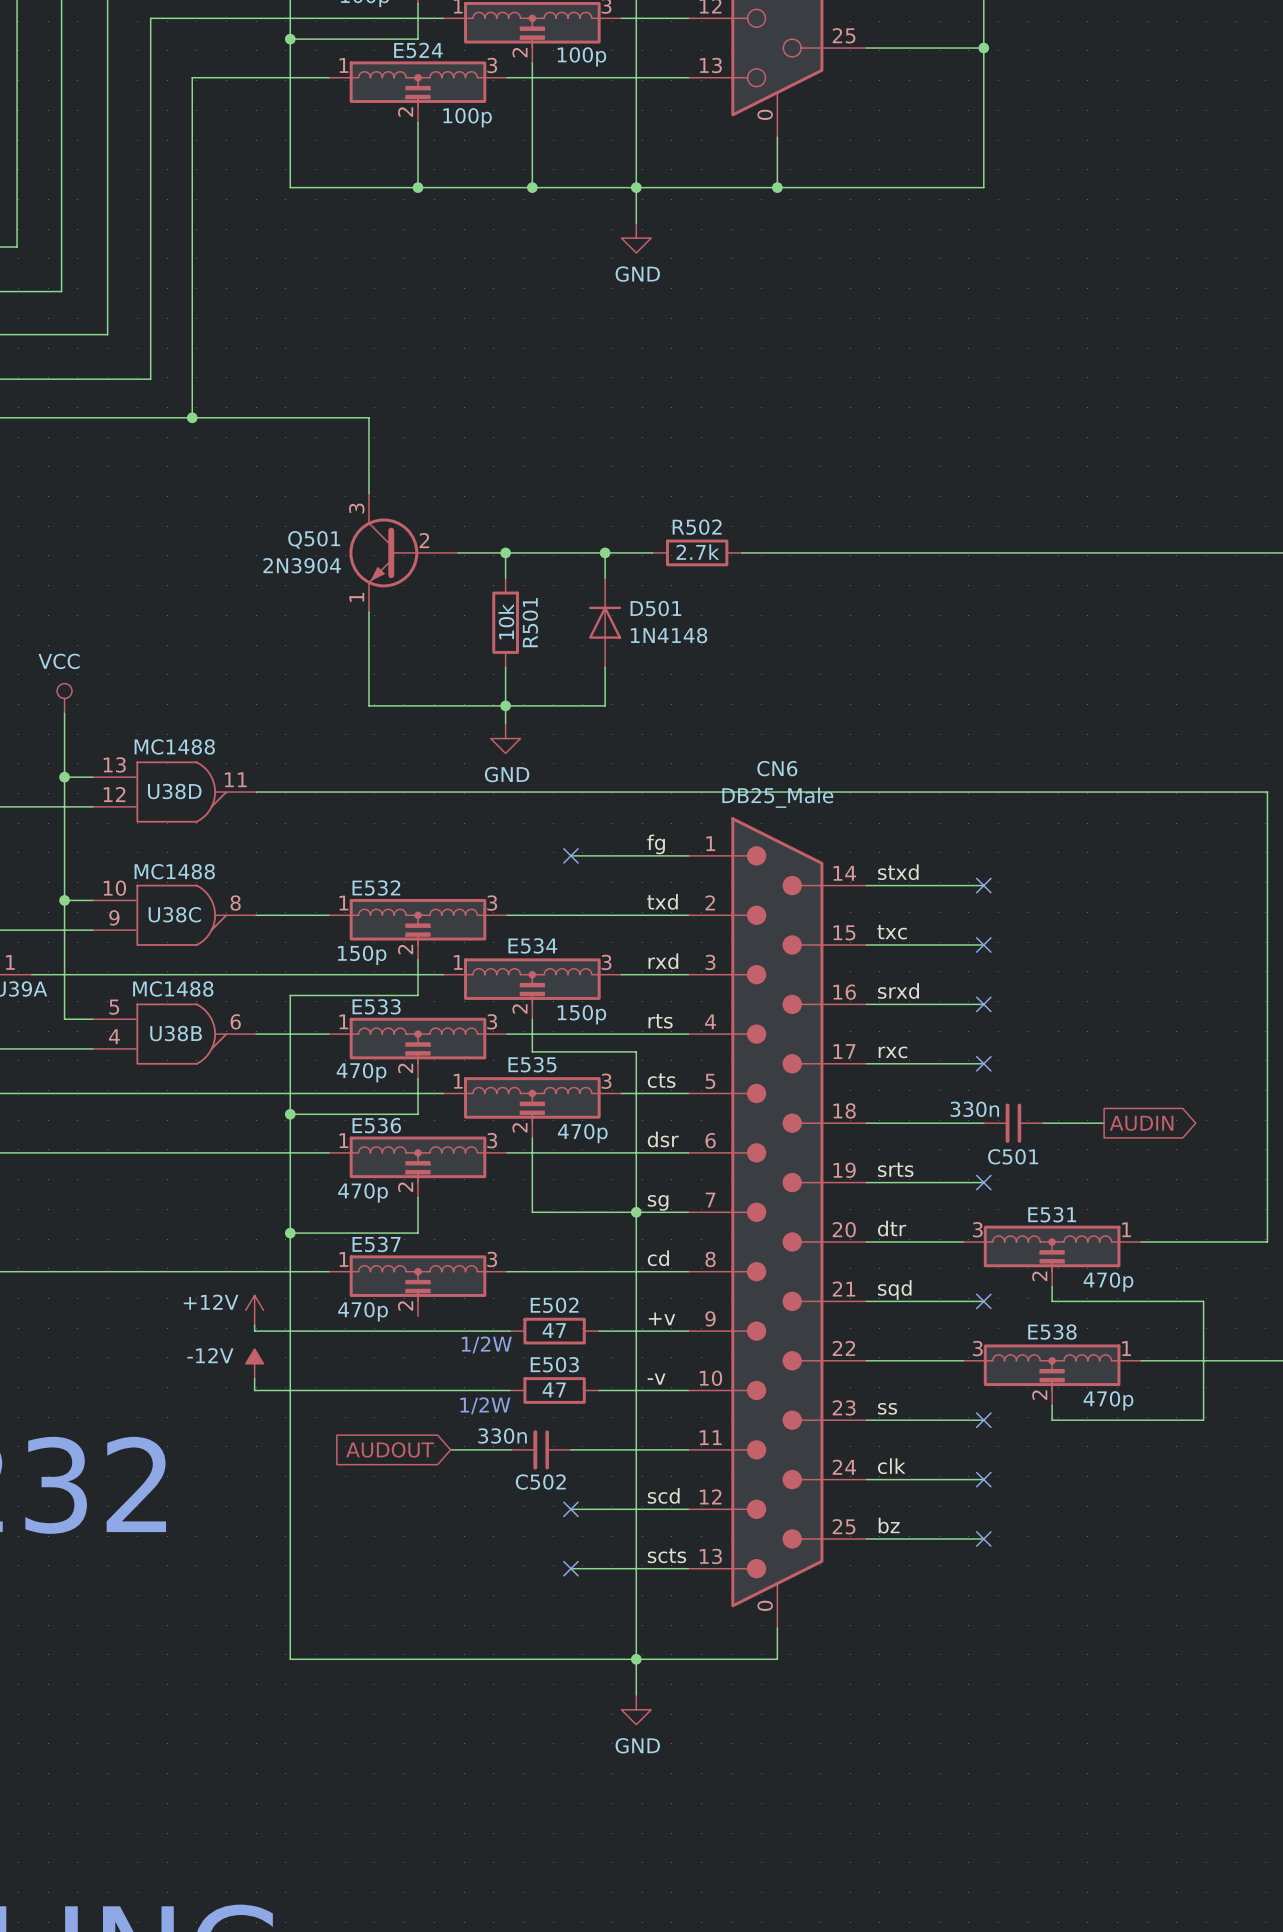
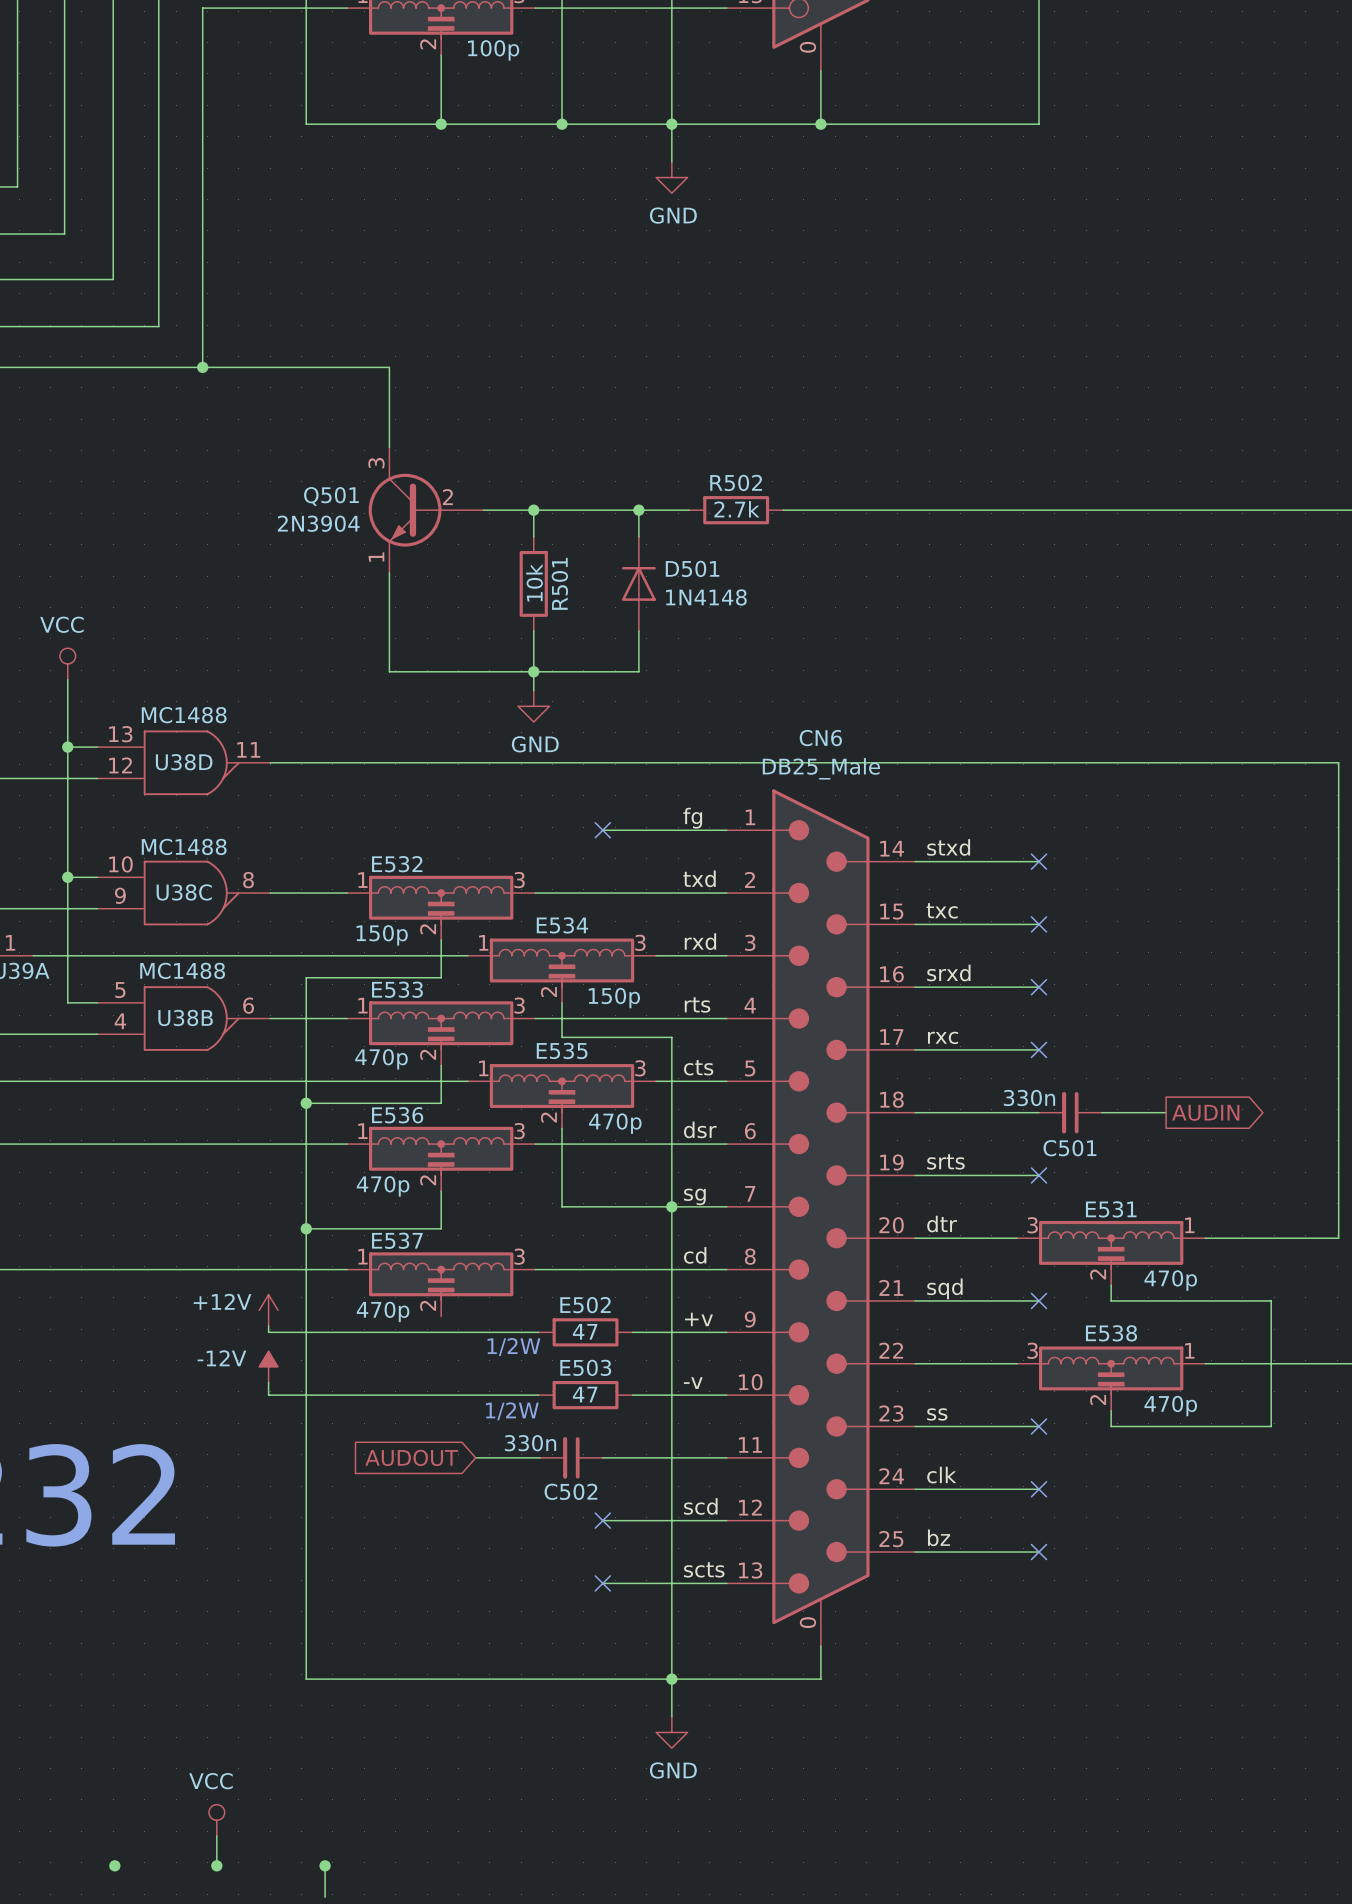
power symbol: none -> VCC (216, 1820)
wire: none -> (216, 1836) (216, 1865)
junction: none -> (114, 1865)
junction: none -> (216, 1865)
wire: none -> (325, 1865) (325, 1897)
junction: none -> (325, 1865)

